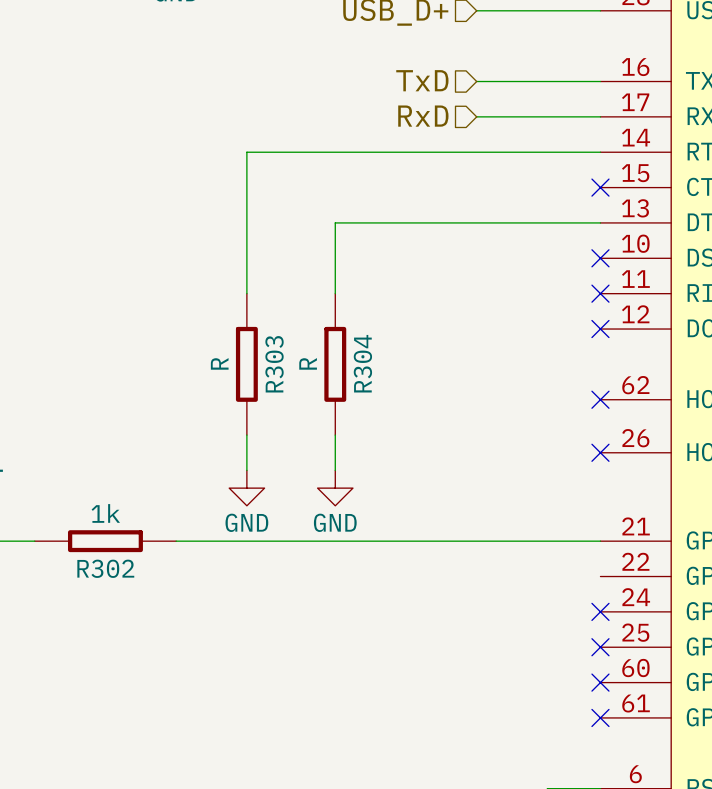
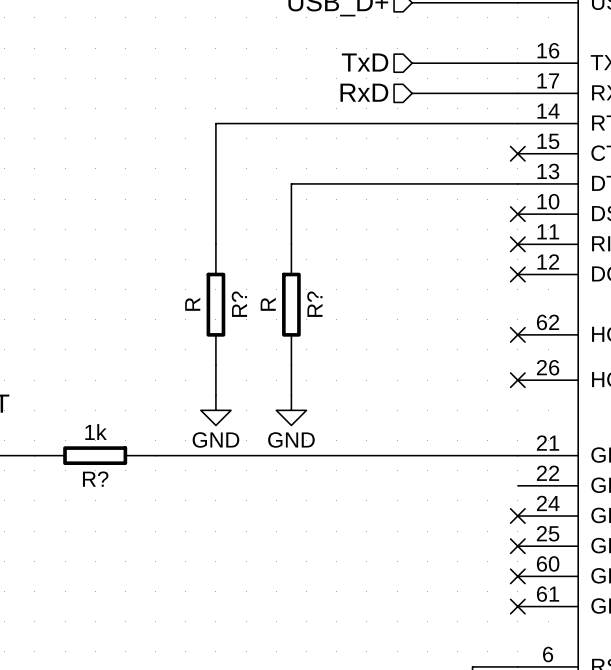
R304 name: R304 (362, 363) -> R? (314, 304)
R303 name: R303 (274, 364) -> R? (239, 304)
R302 name: R302 (105, 568) -> R? (95, 479)

